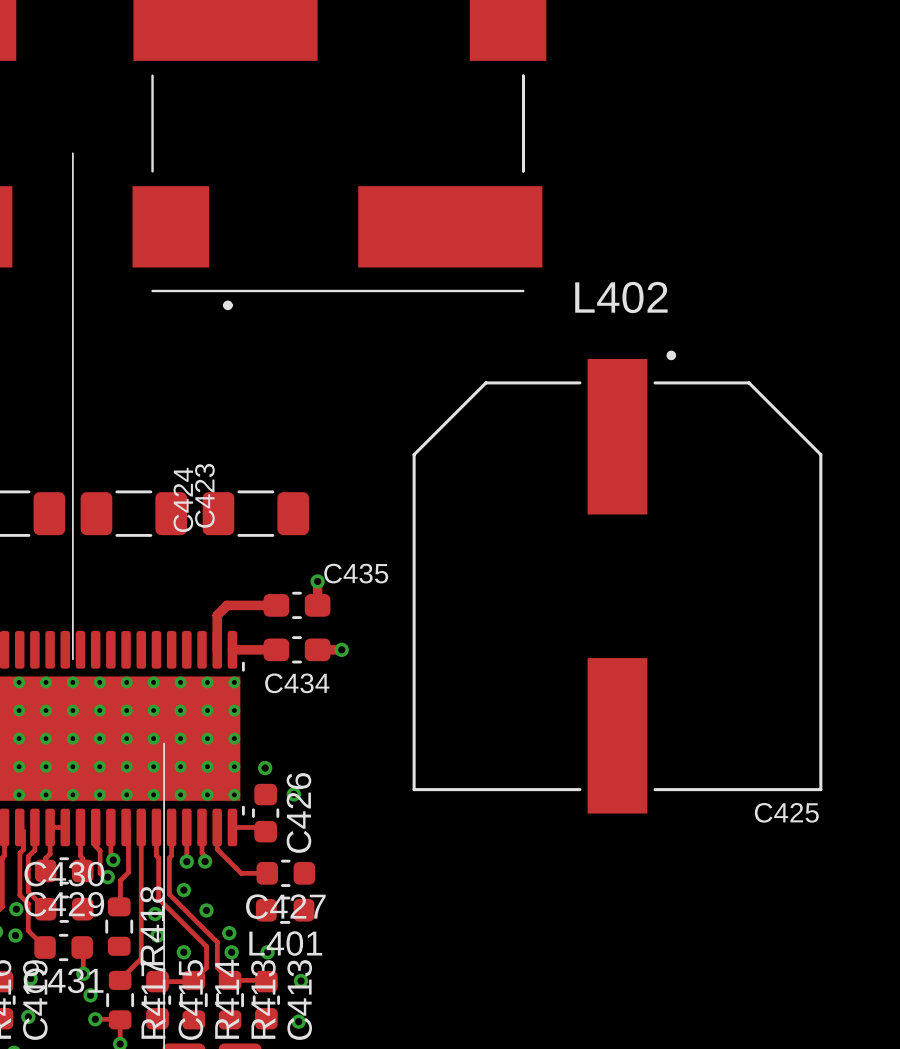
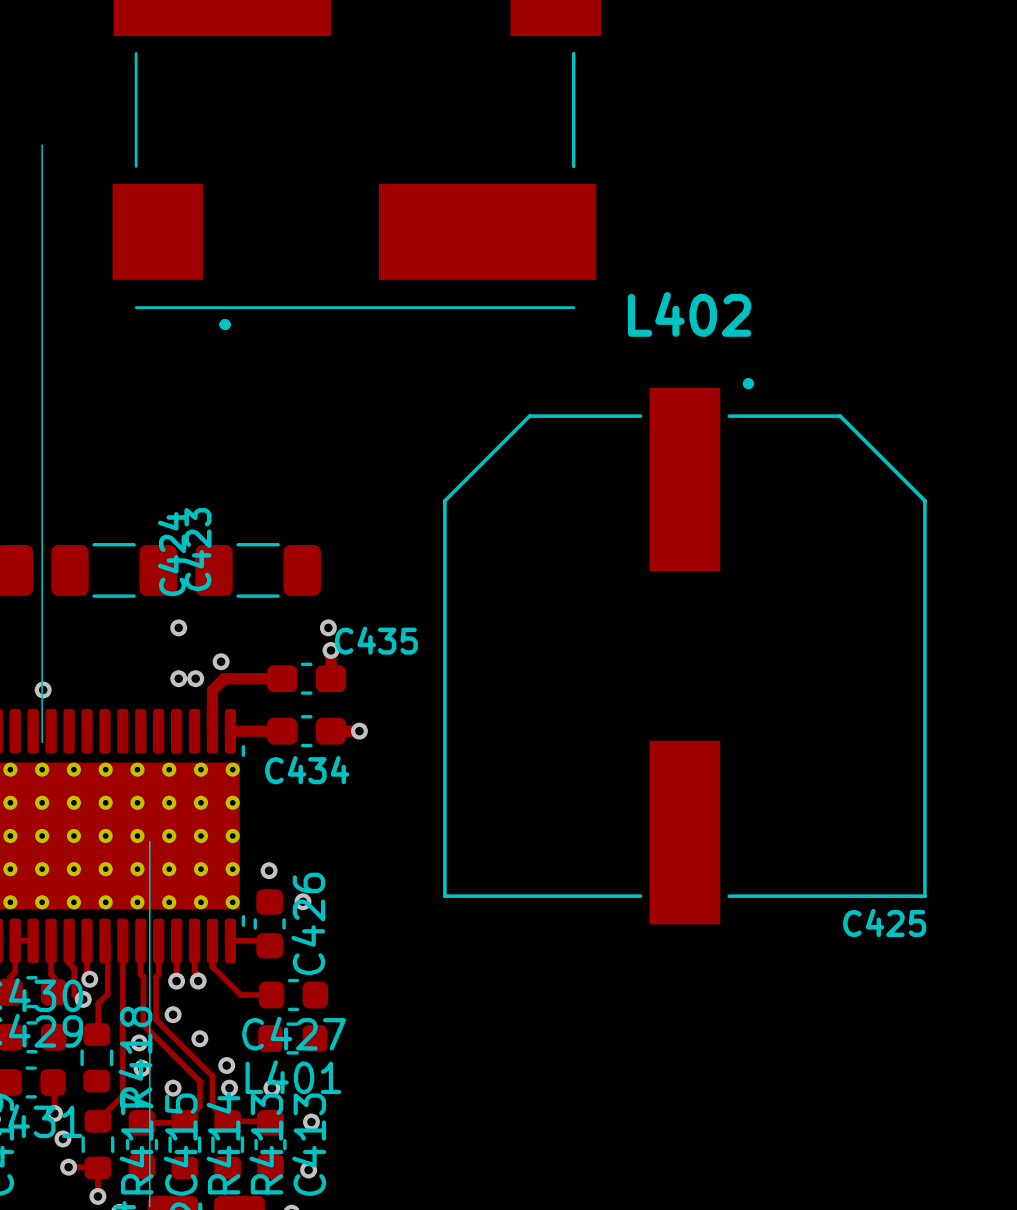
via: none -> (178, 627)
via: none -> (328, 627)
via: none -> (221, 661)
via: none -> (178, 678)
via: none -> (195, 678)
via: none -> (43, 689)

